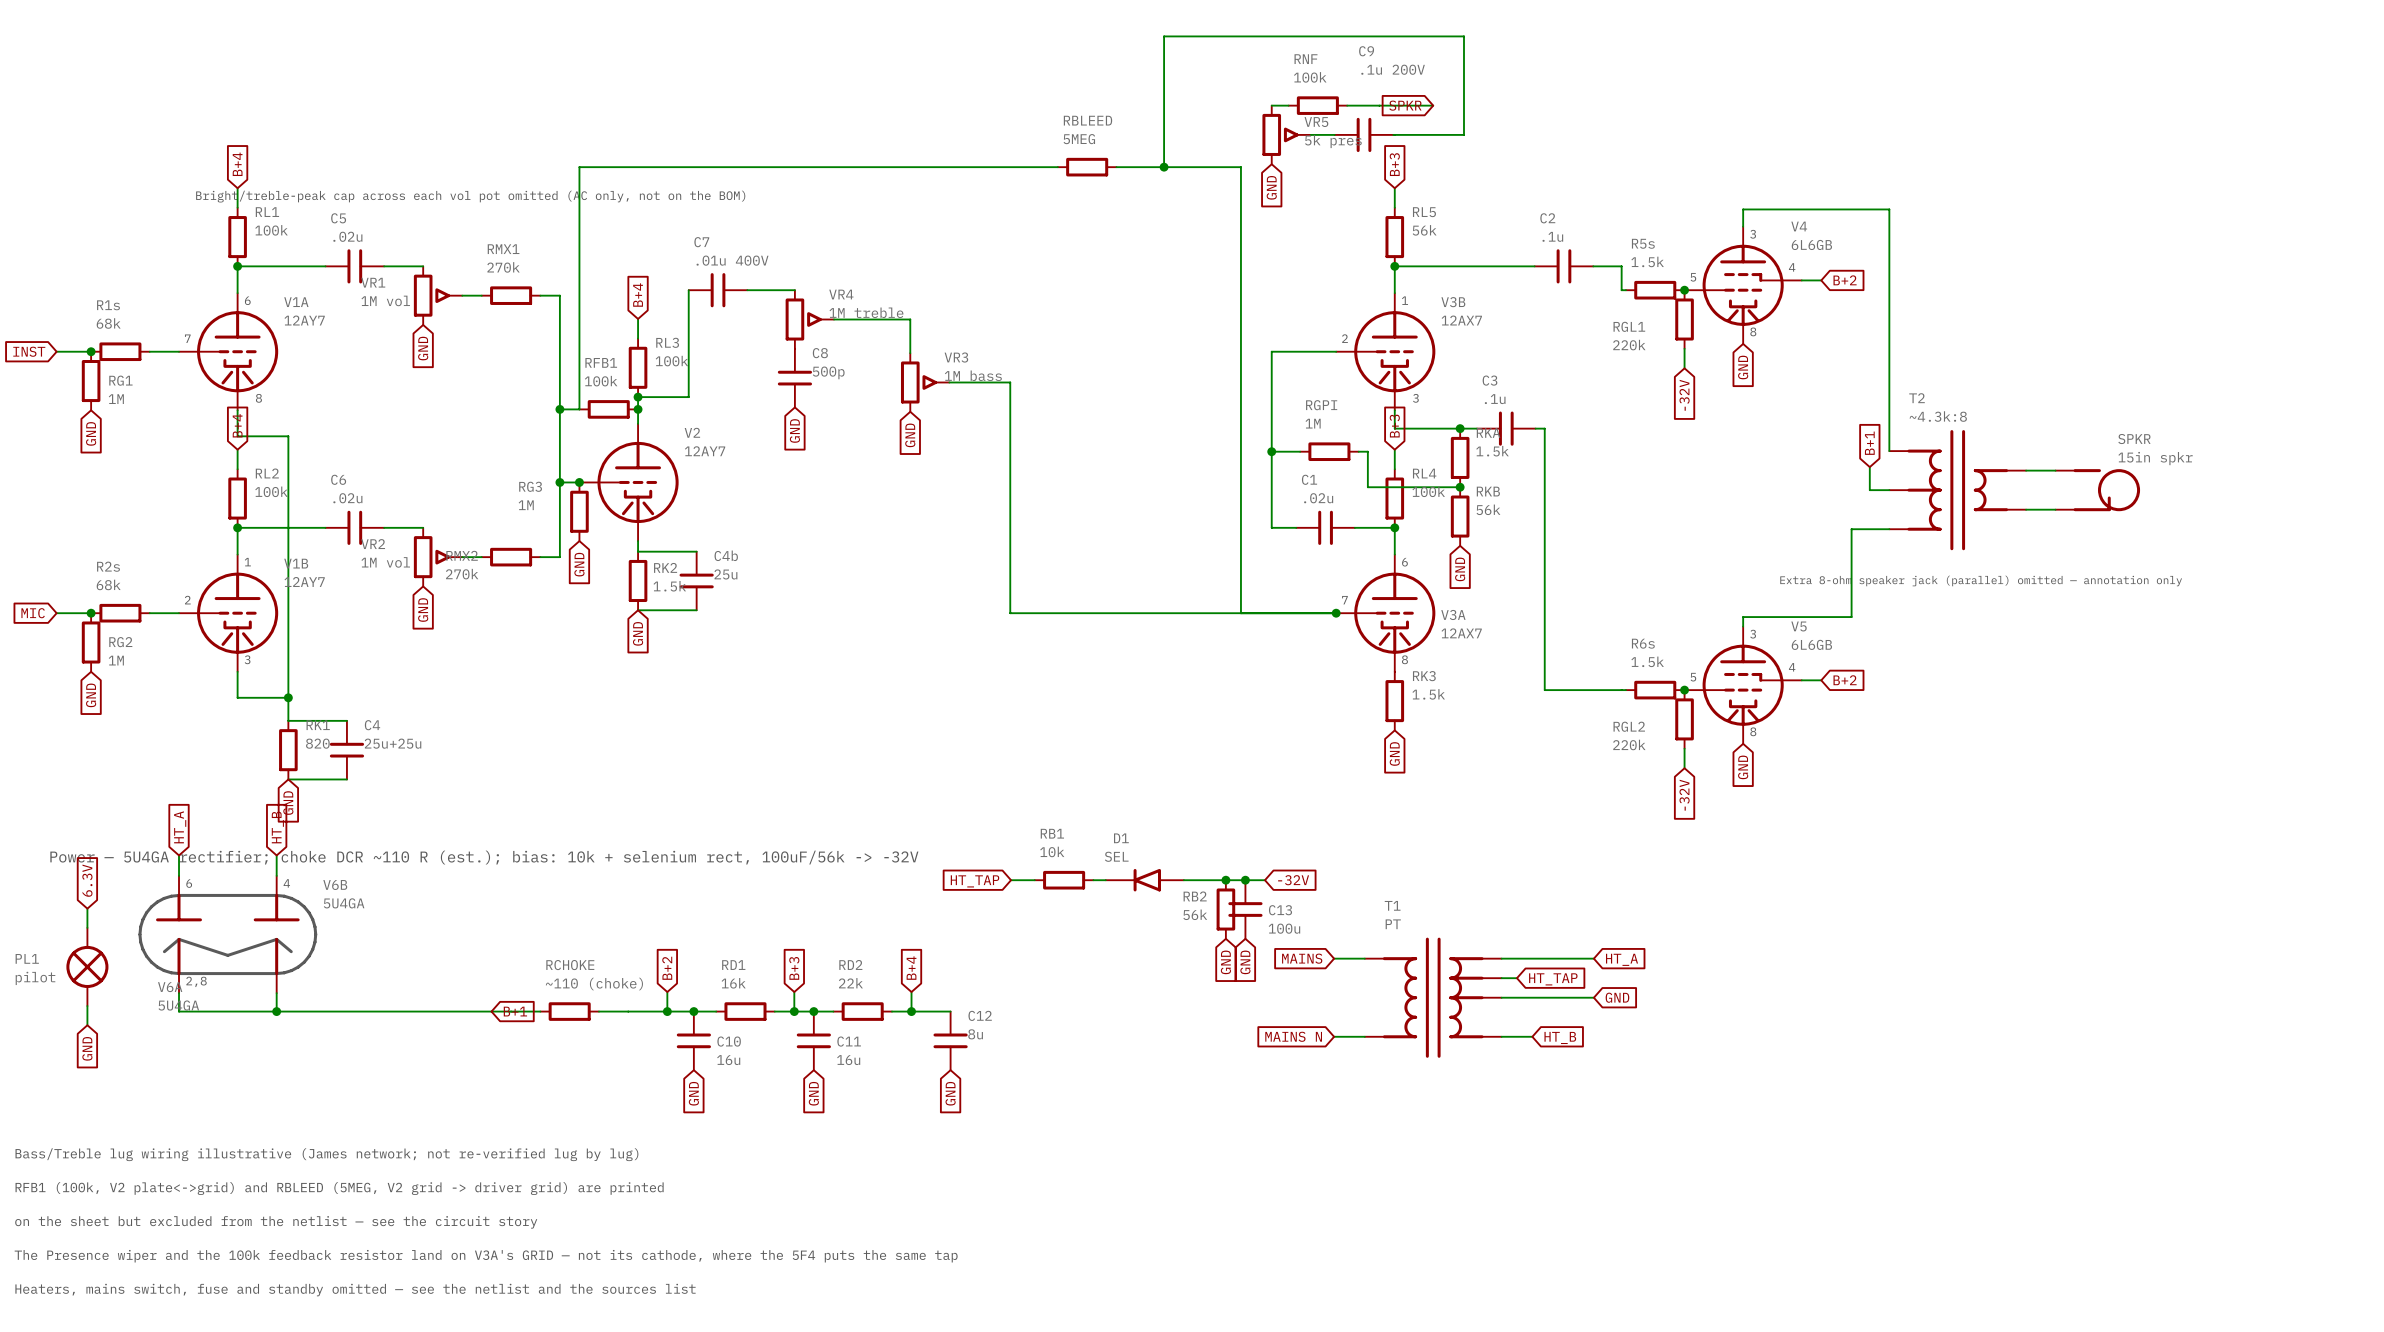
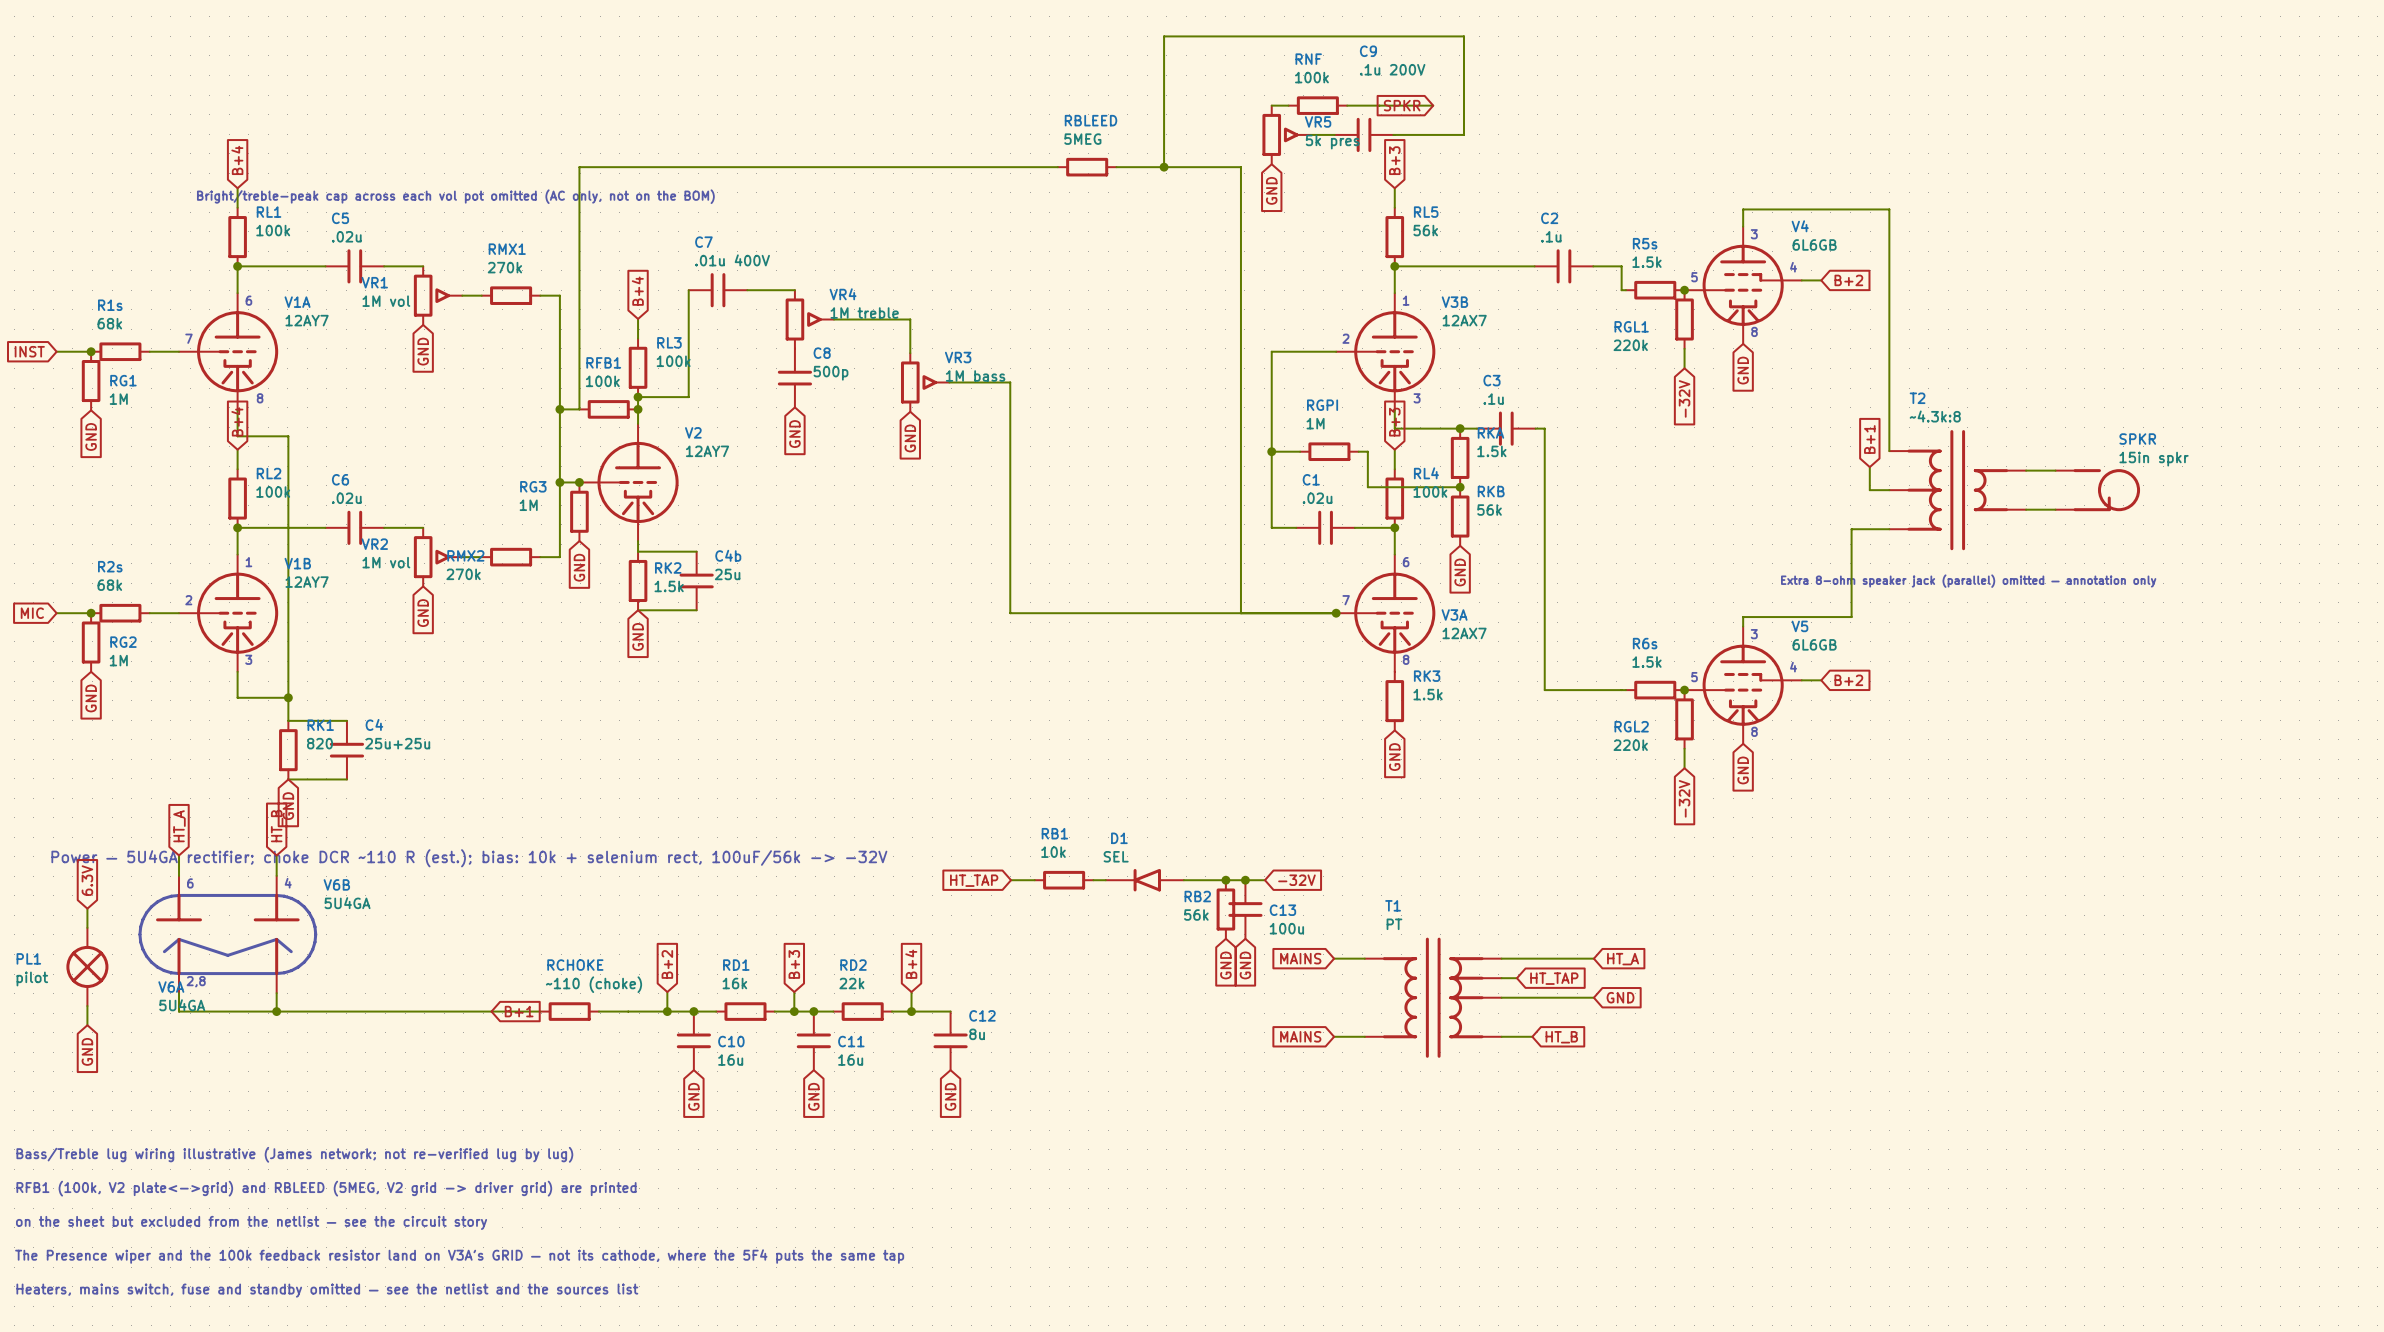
global label: MAINS N (1293, 1036) -> MAINS (1300, 1036)

